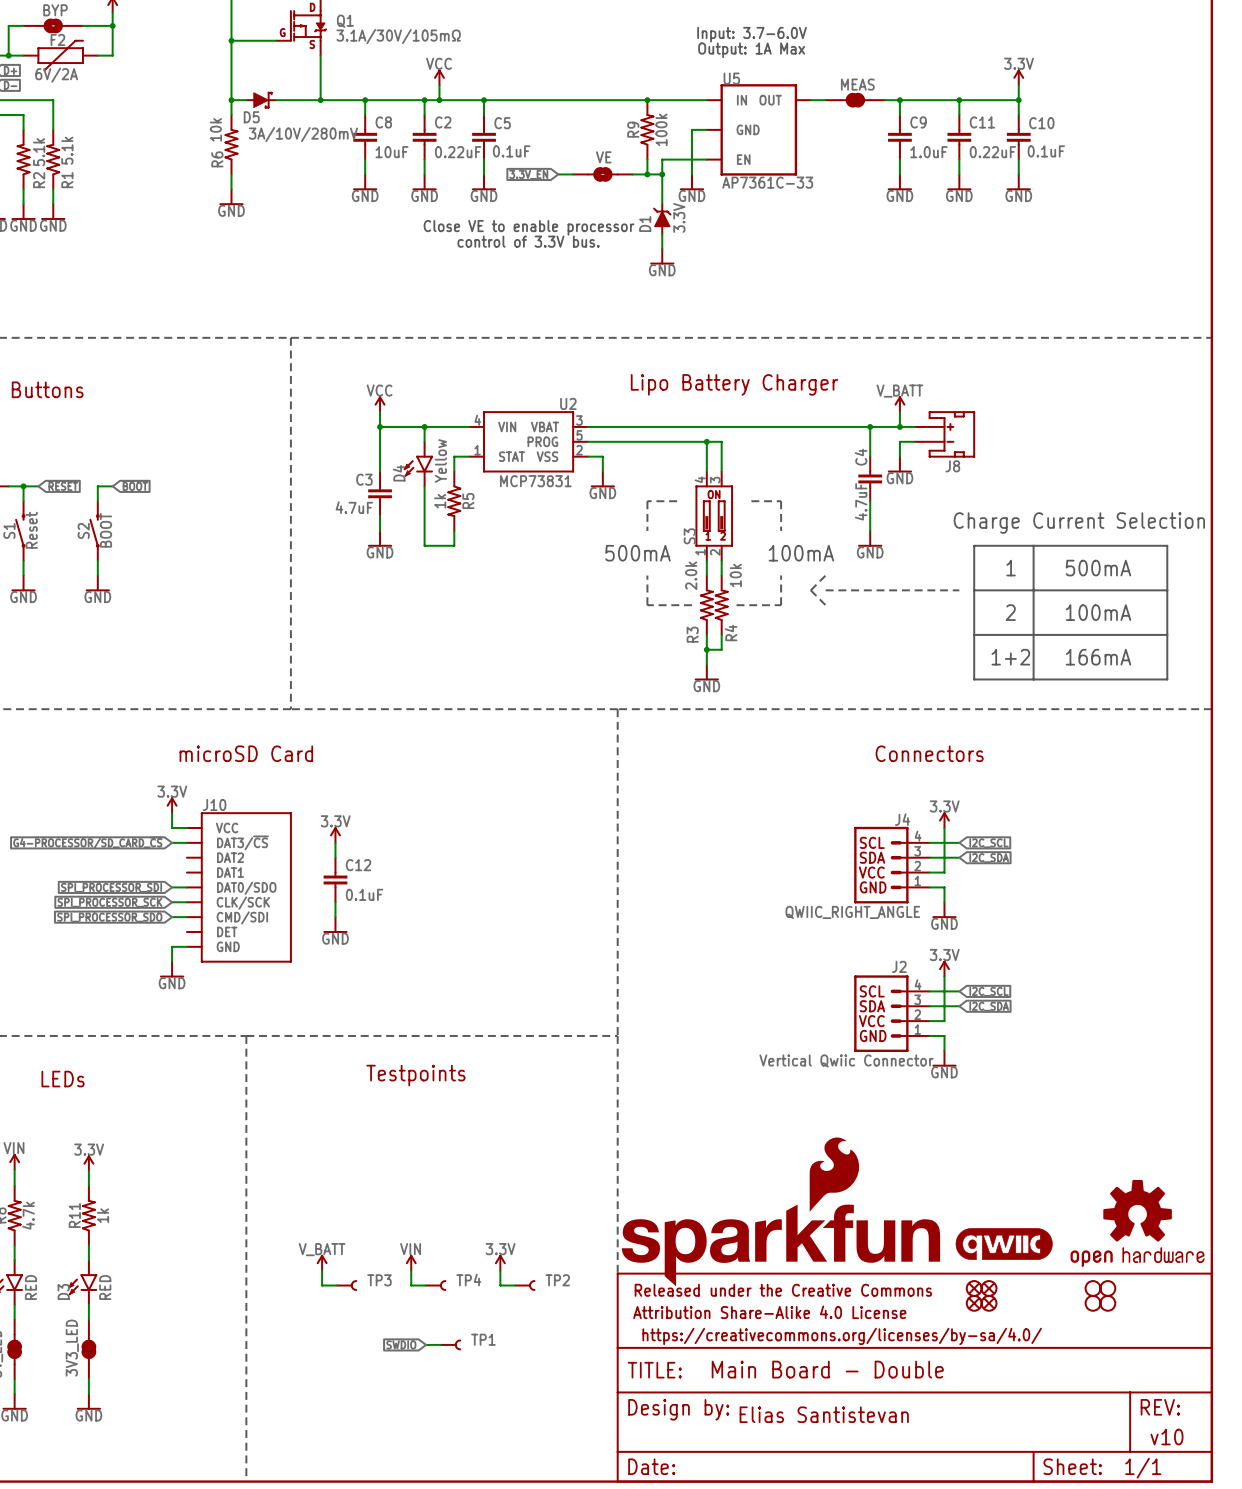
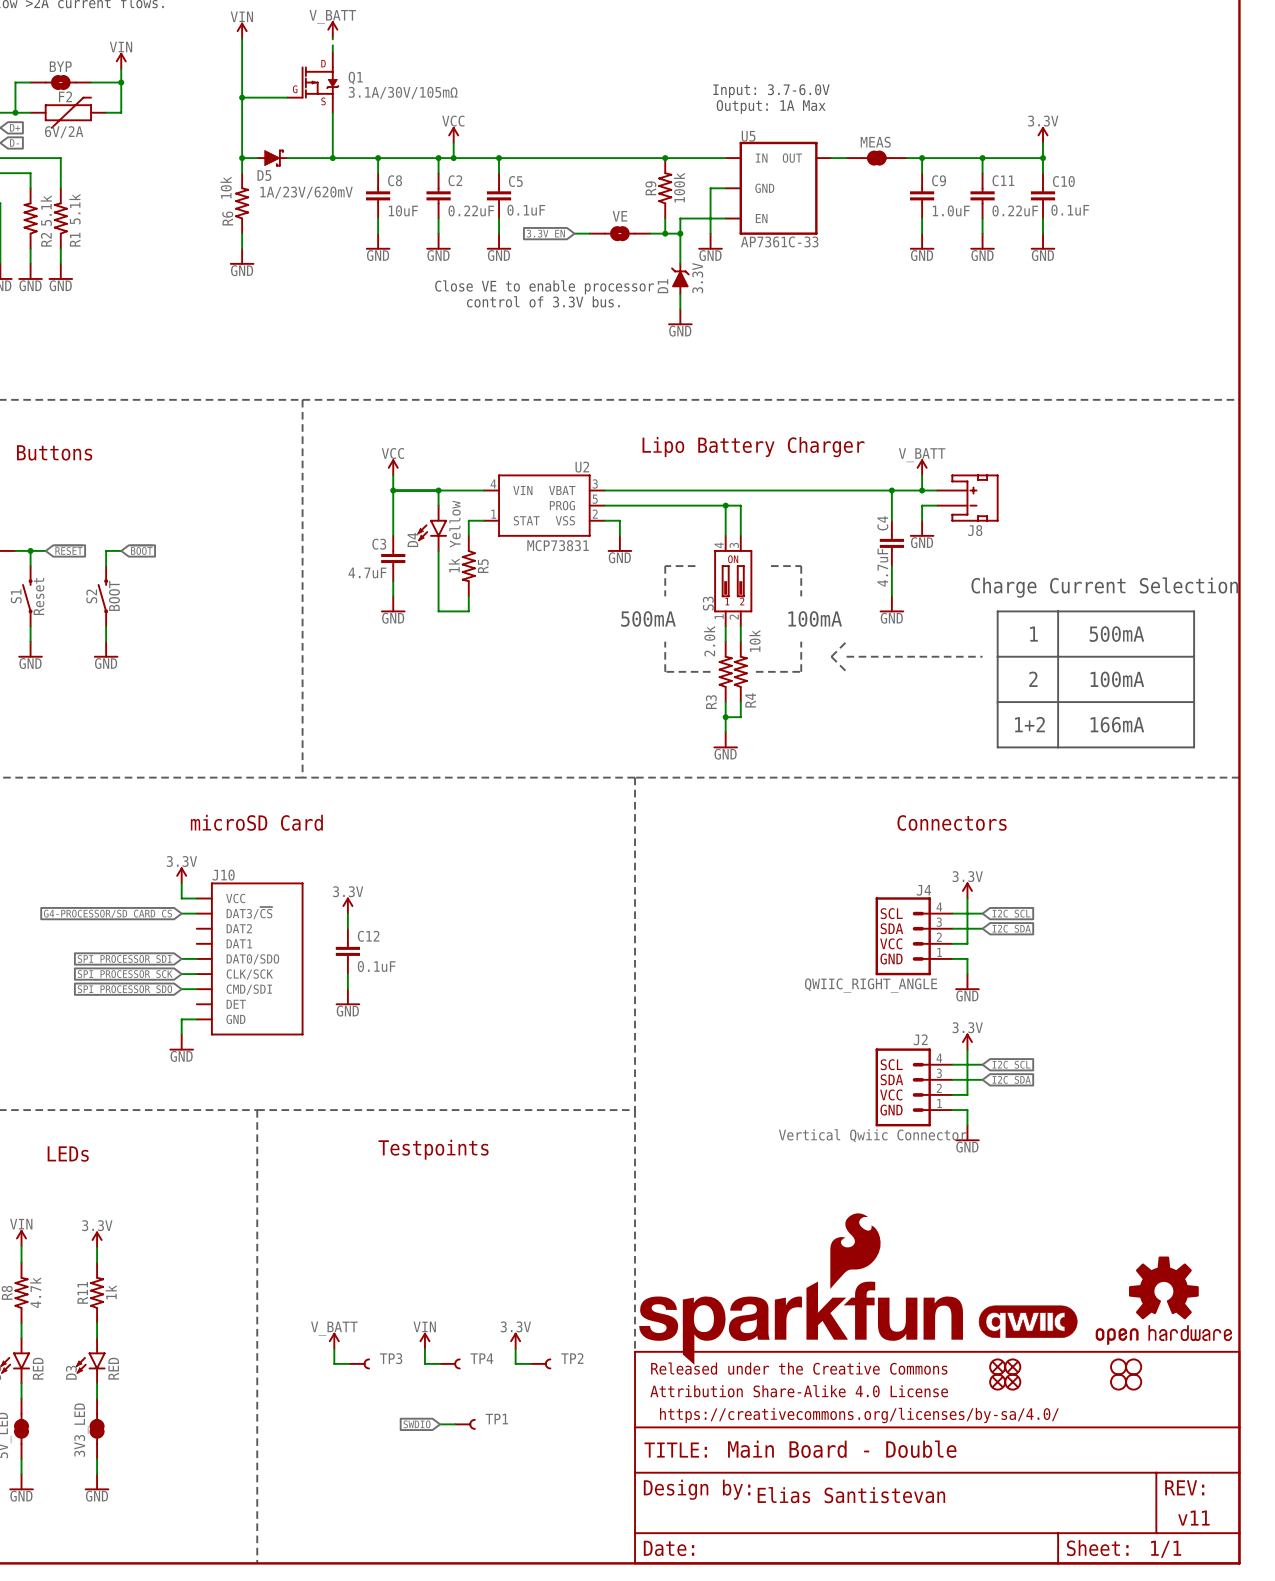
D5 value: 3A/10V/280mV (303, 134) -> 1A/23V/620mV (306, 192)
text: v10 (1166, 1437) -> v11 (1193, 1518)

